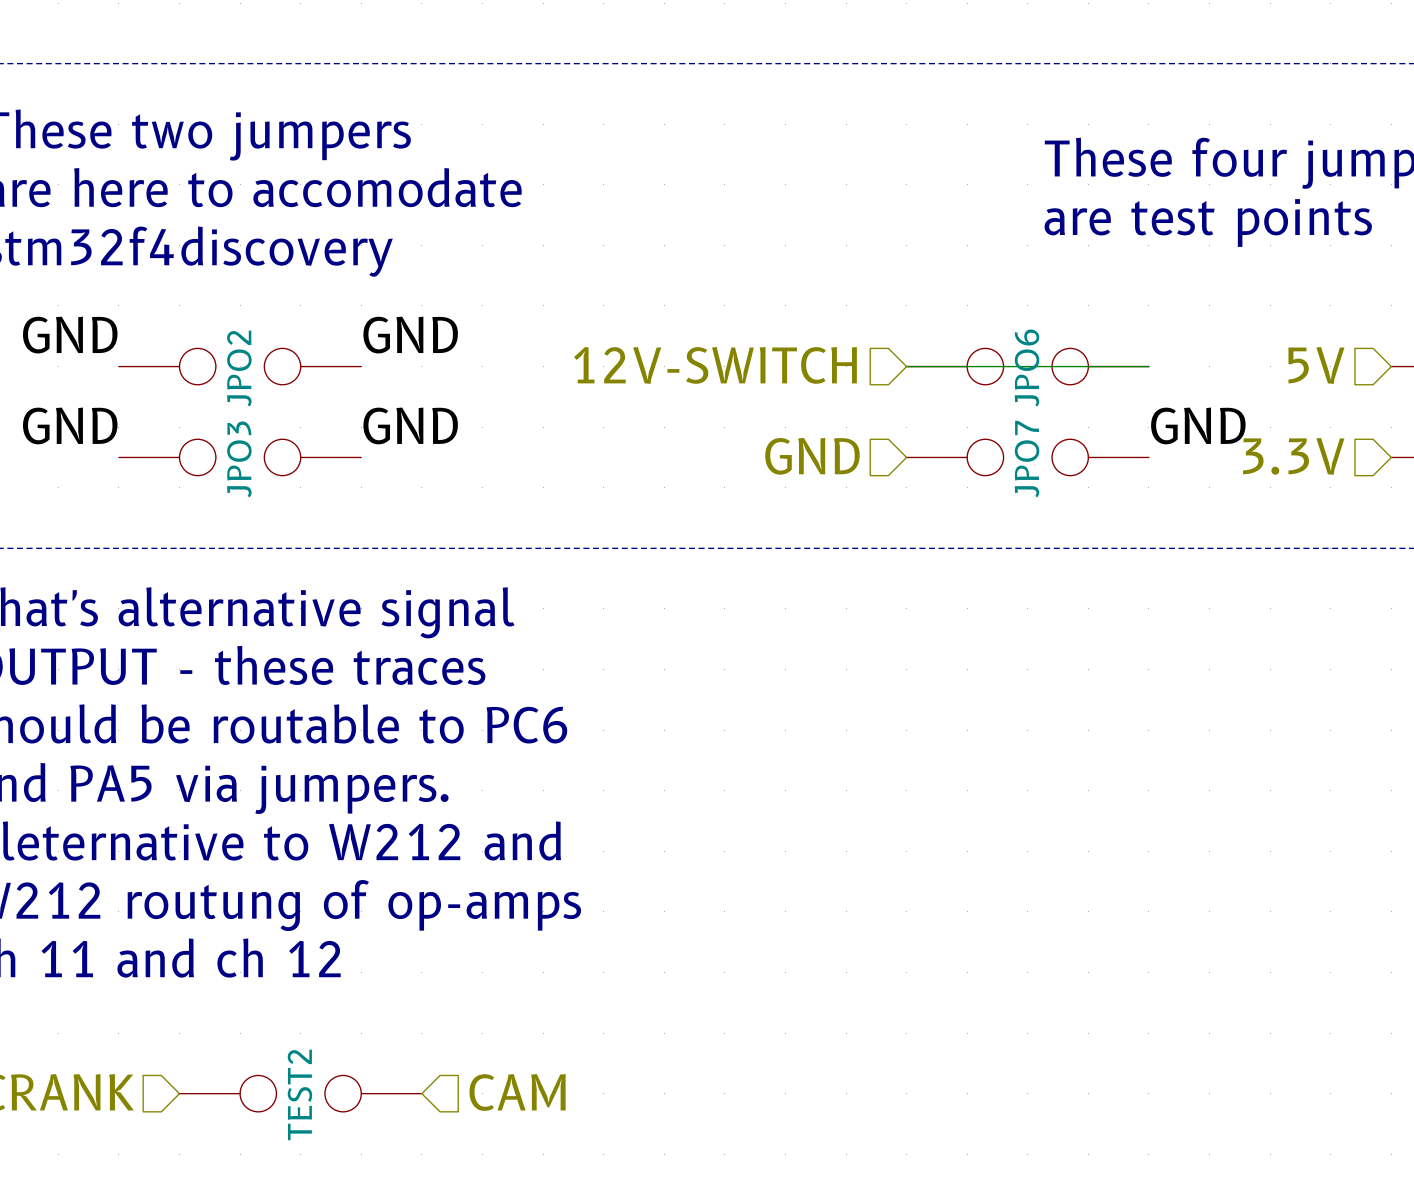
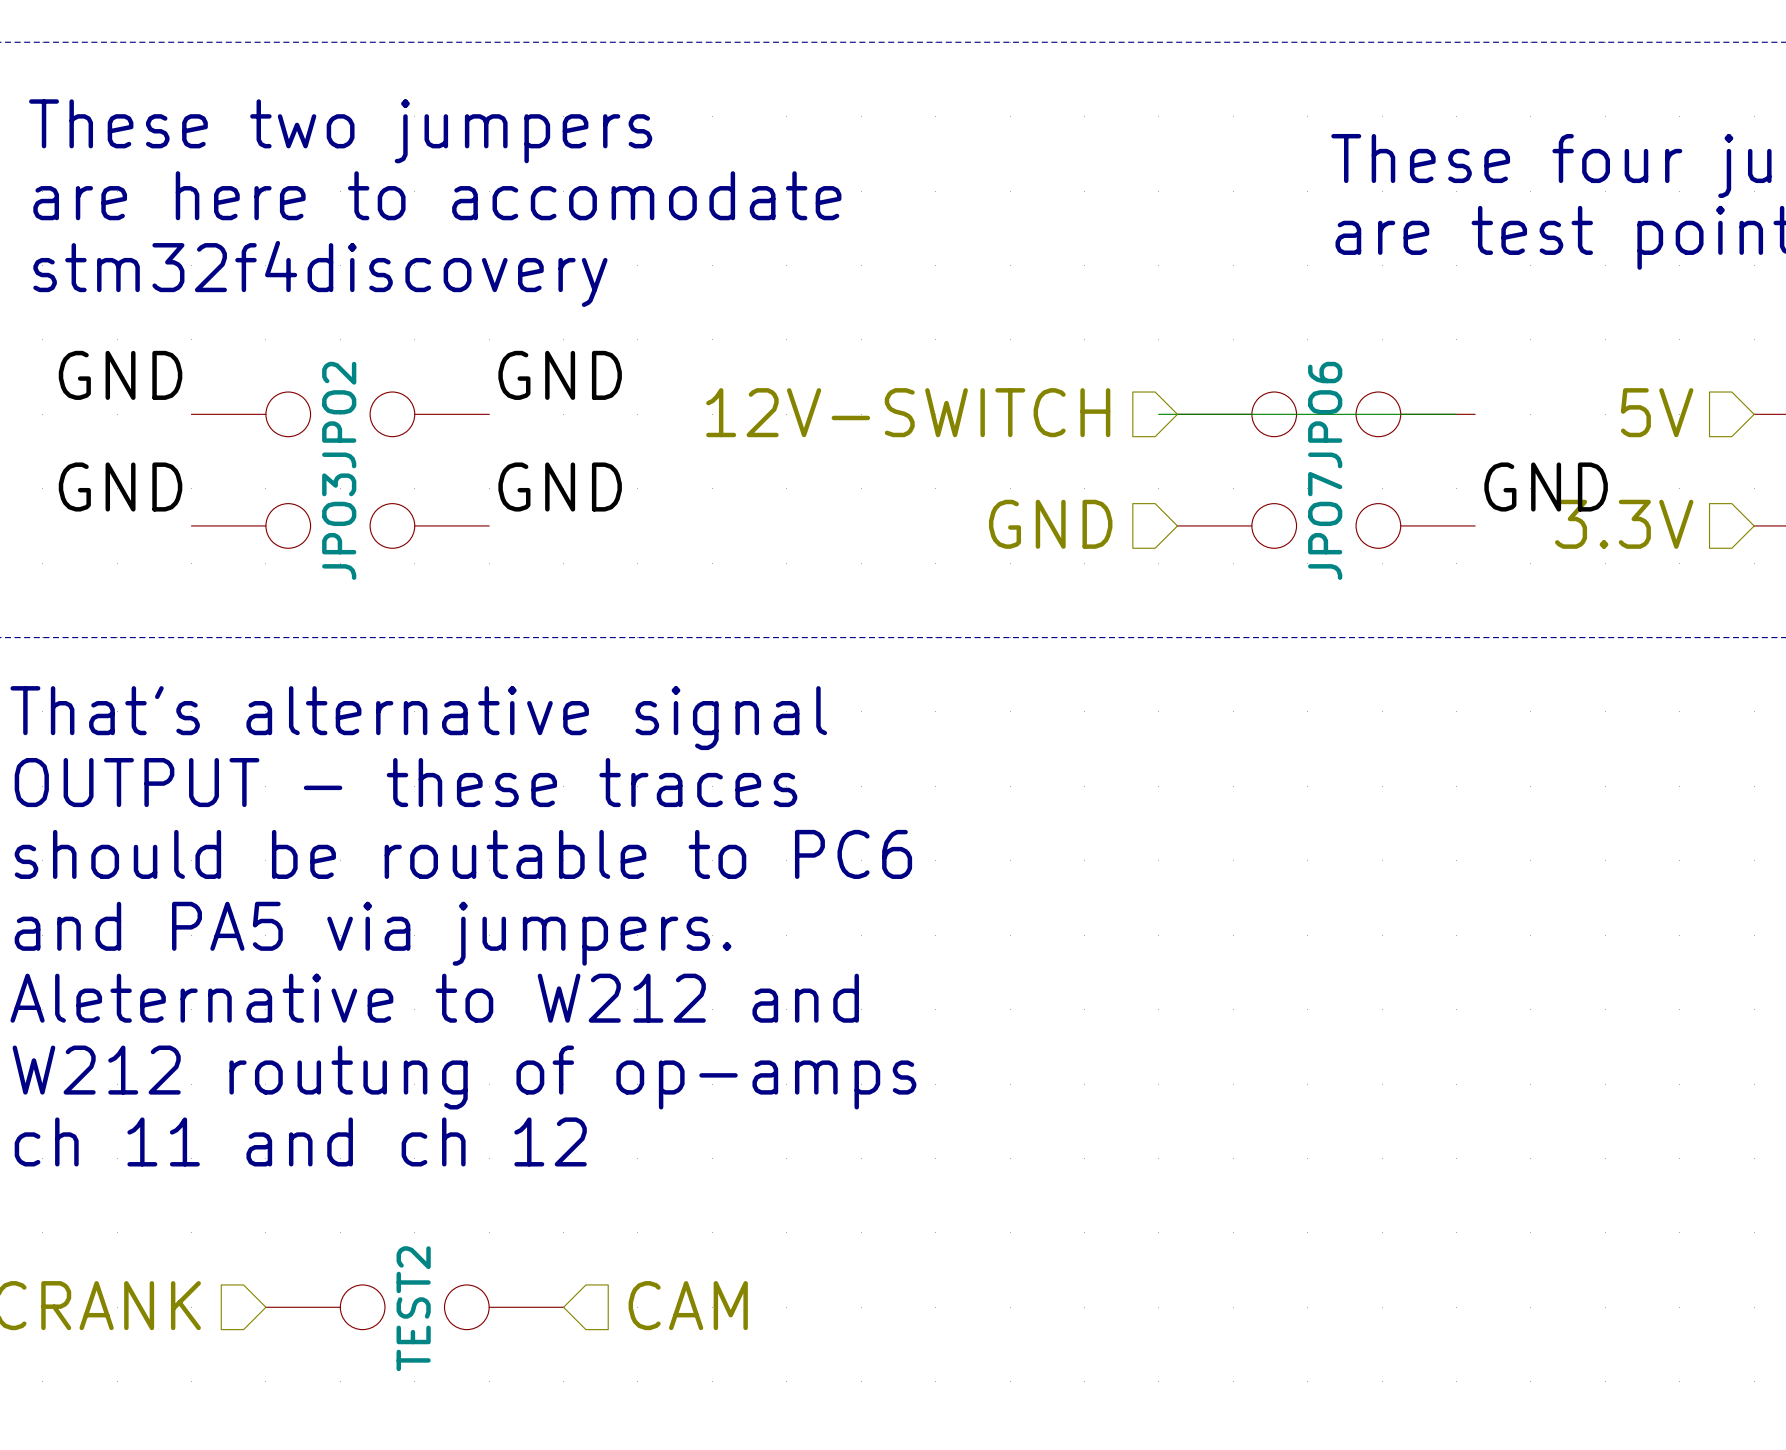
hierarchical label position: 12V-SWITCH (715, 365) -> 12V-SWITCH (908, 412)
JPO6 position: (1027, 366) -> (1326, 414)
label position: GND (1198, 425) -> GND (1546, 487)
hierarchical label position: GND (812, 456) -> GND (1050, 524)
JPO7 position: (1027, 457) -> (1326, 525)

